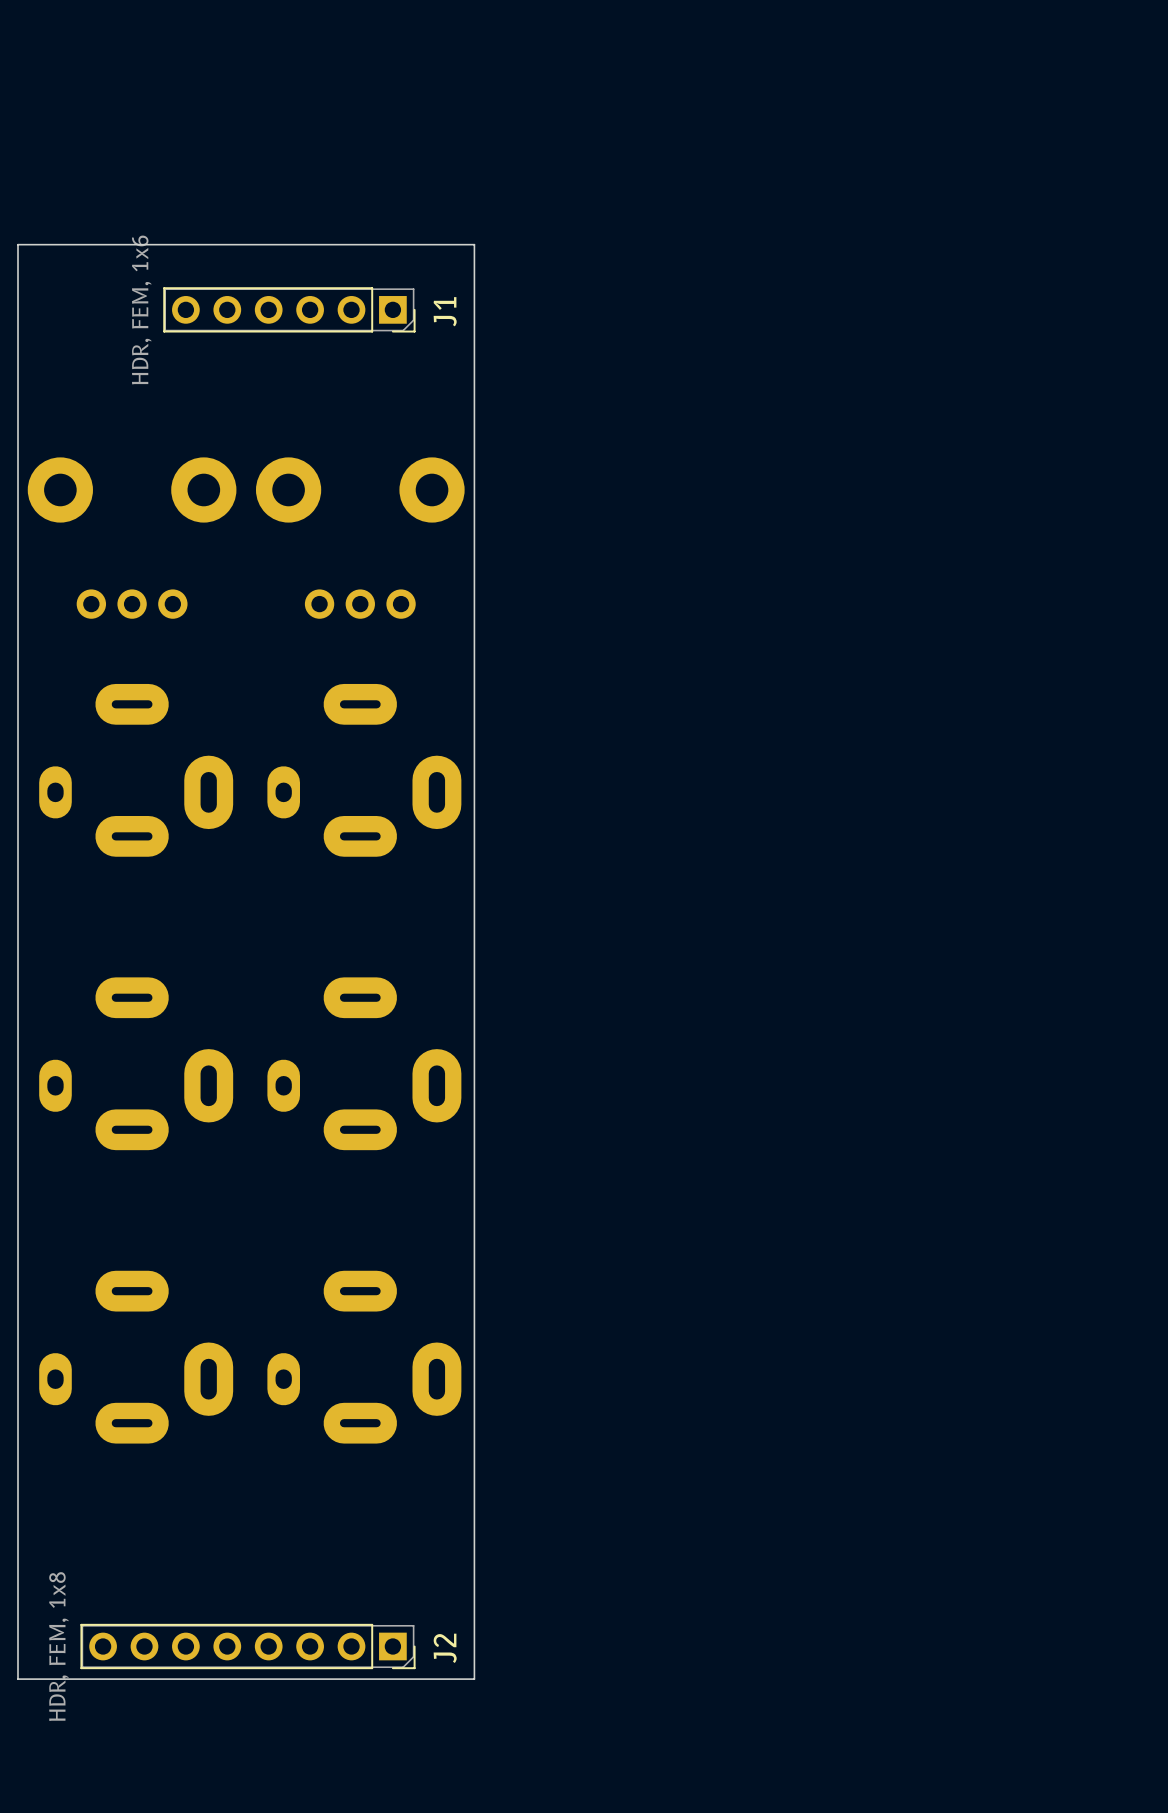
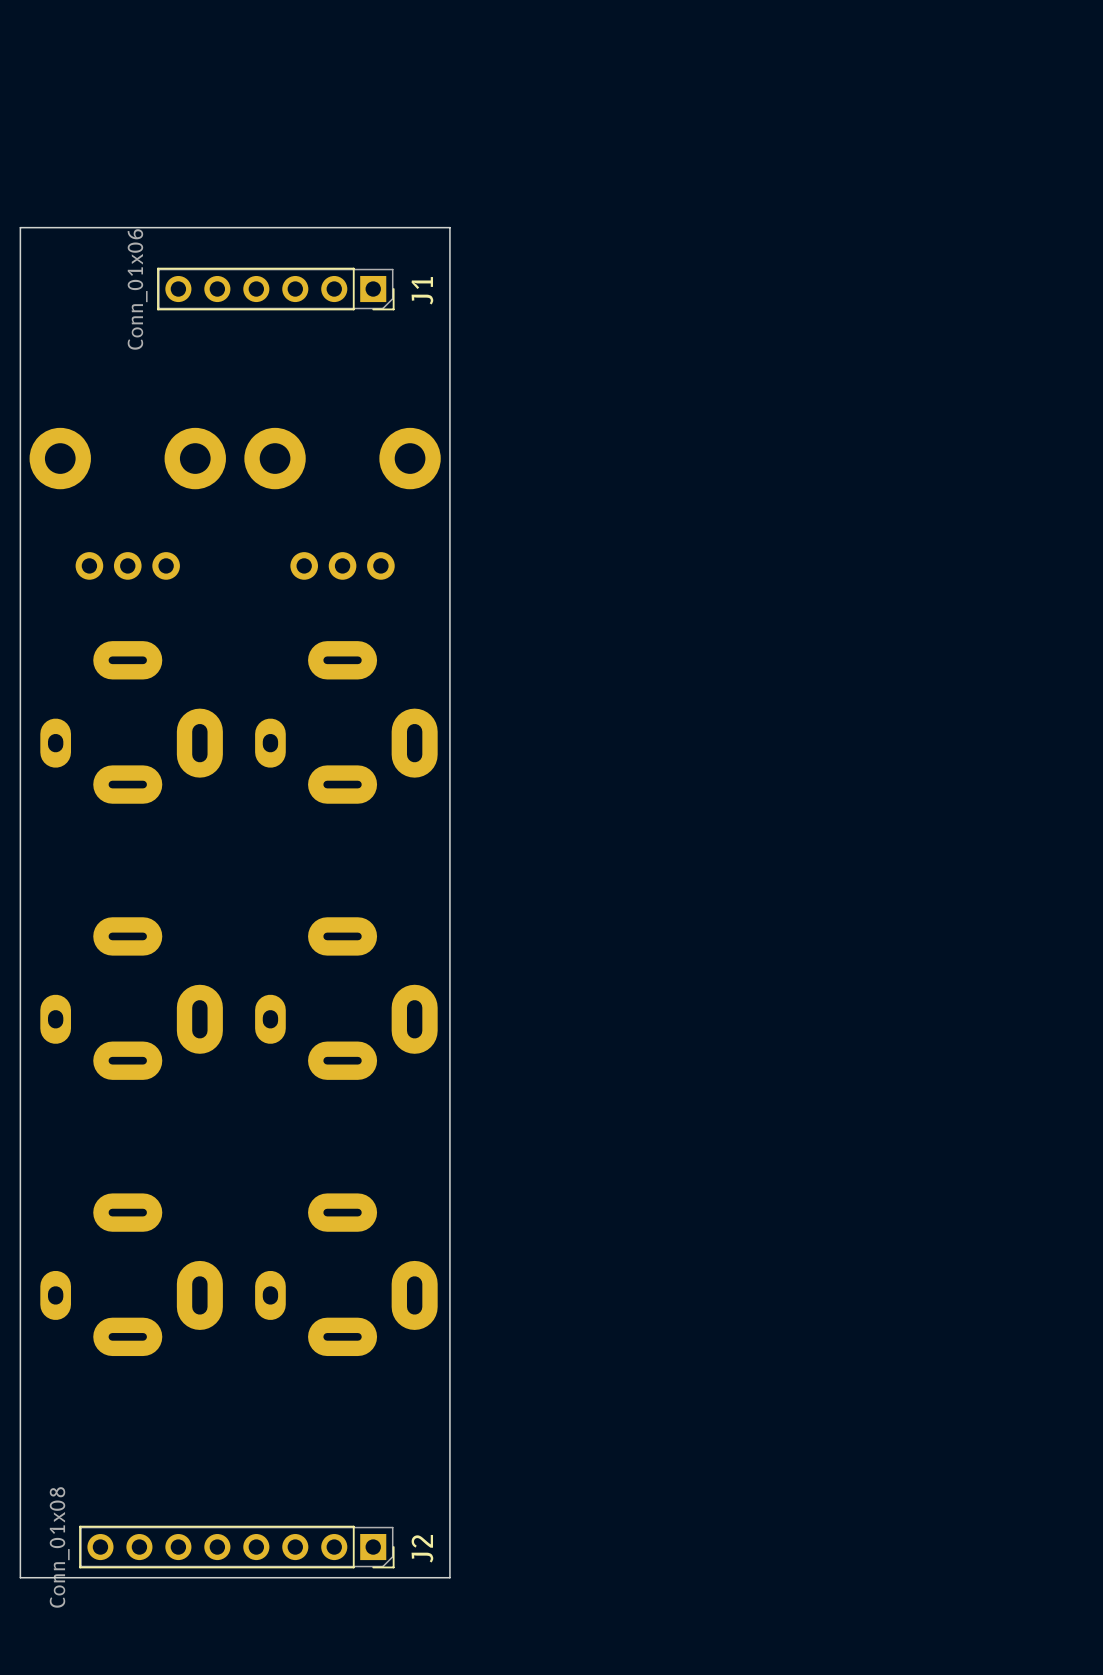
J1 value: HDR, FEM, 1x6 (141, 309) -> Conn_01x06 (137, 289)
J2 value: HDR, FEM, 1x8 (58, 1646) -> Conn_01x08 (59, 1547)

